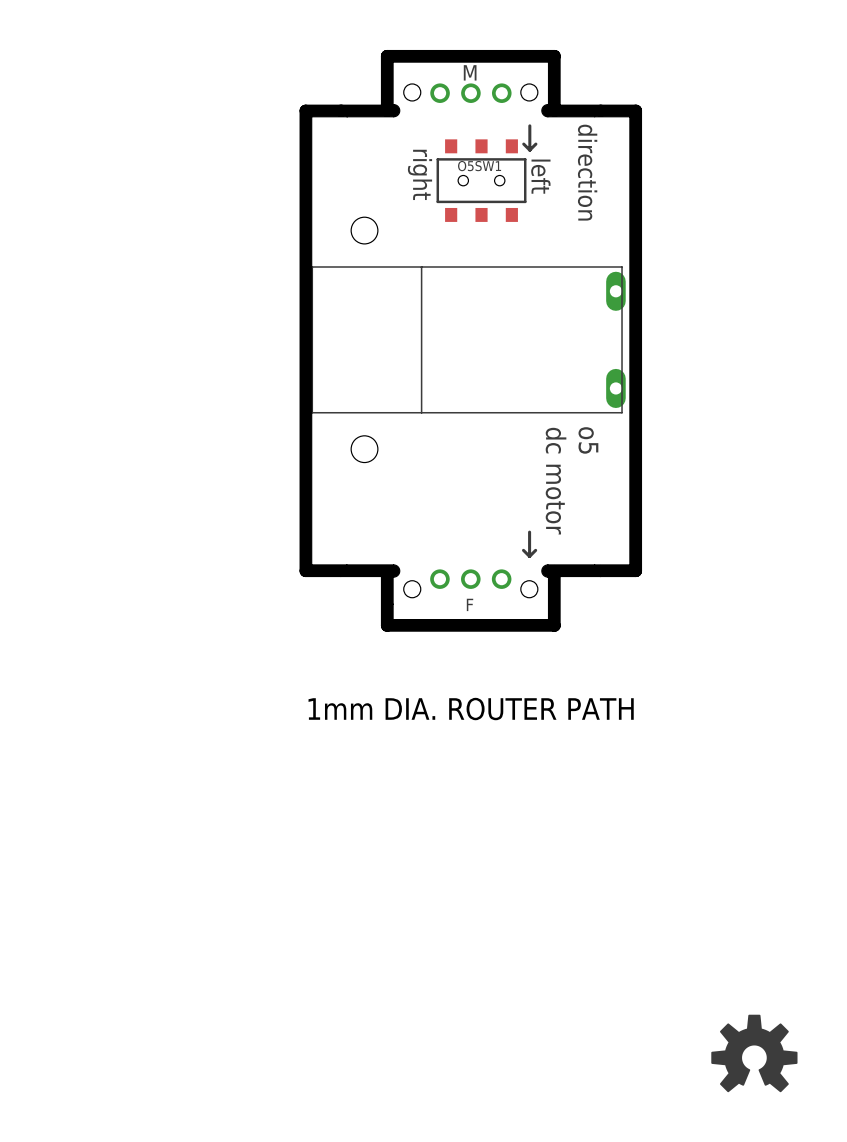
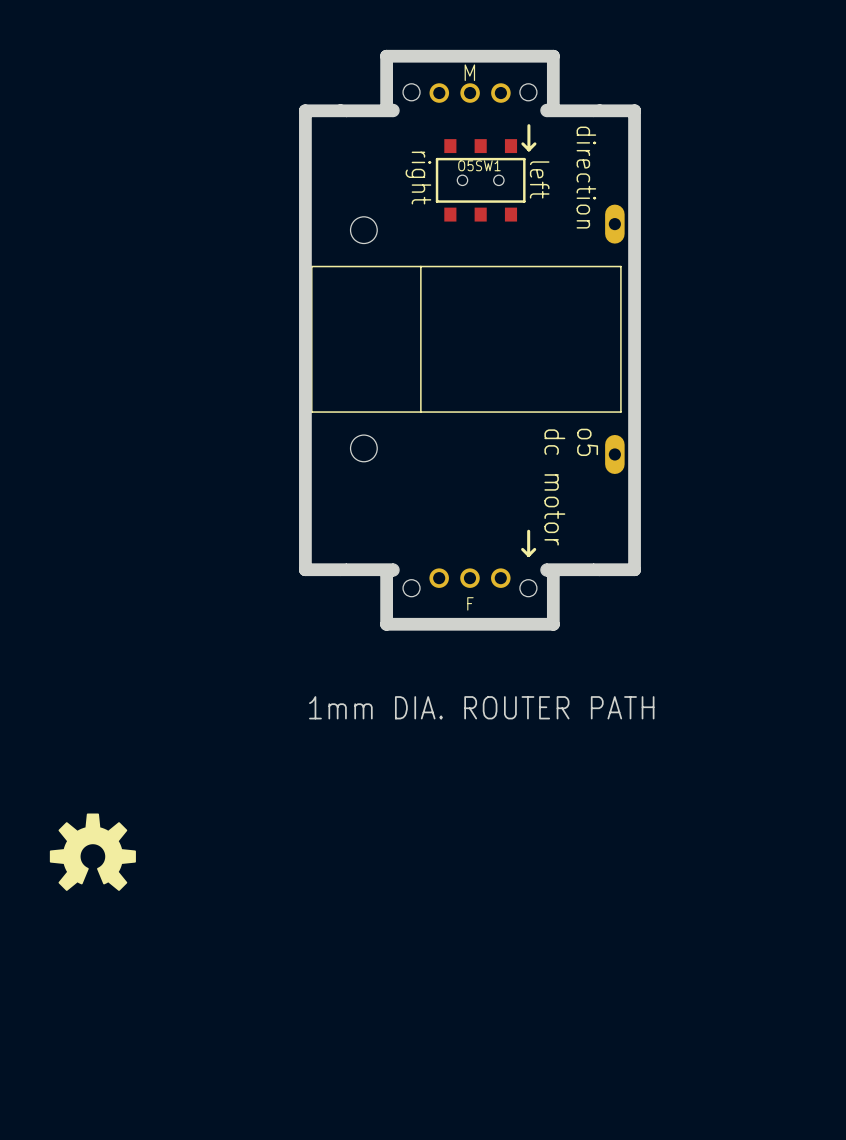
part footprint: [311, 217, 626, 463] -> [310, 204, 625, 474]
drawing: none -> [49, 813, 136, 891]
drawing: [711, 1014, 798, 1093] -> none

